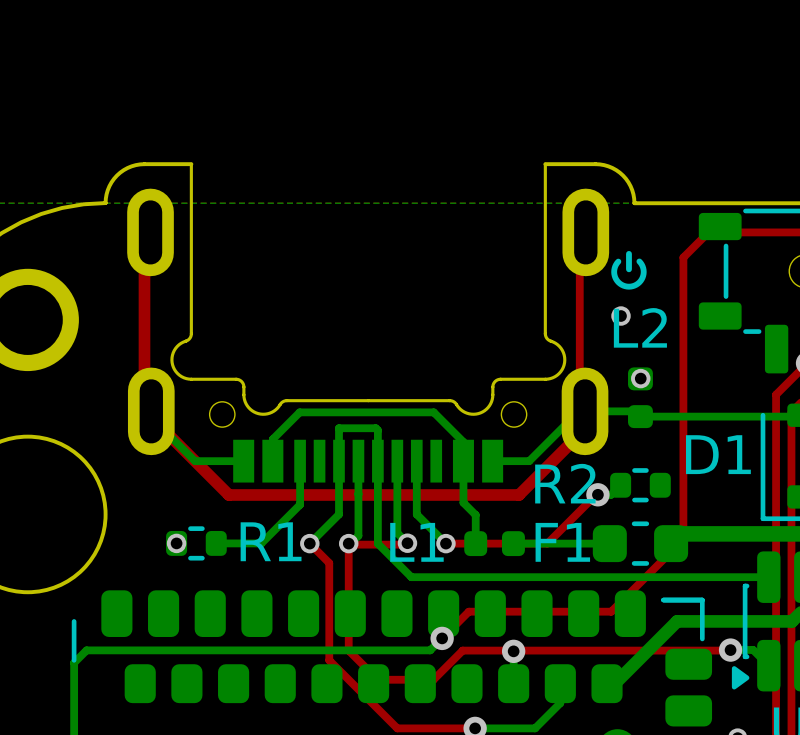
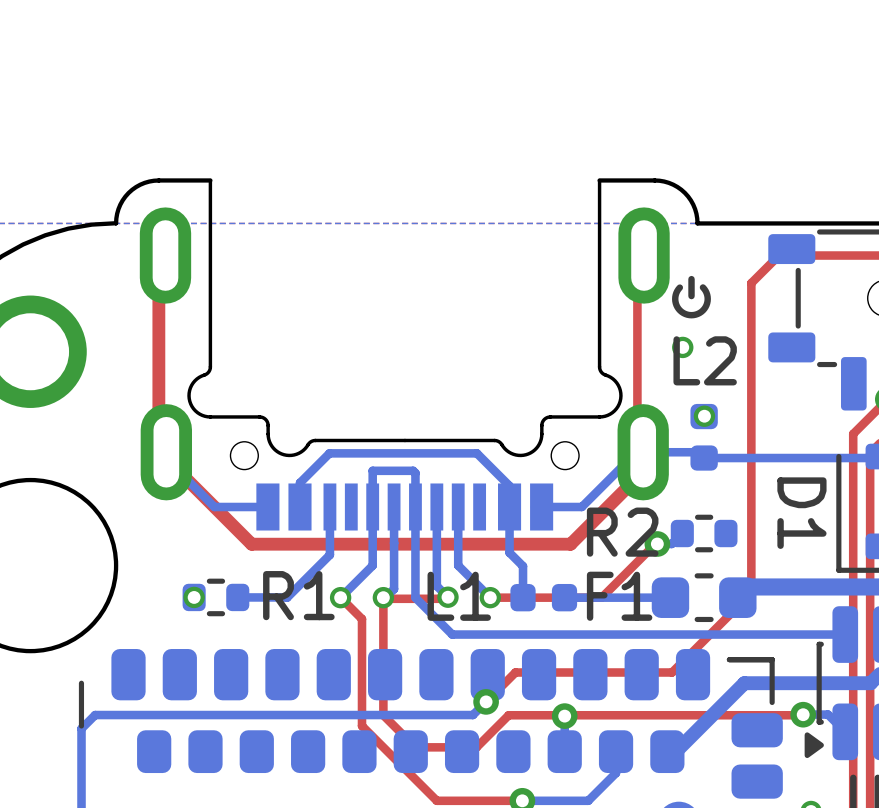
D1 name rotation: 0° (718, 454) -> 90° clockwise (801, 513)

